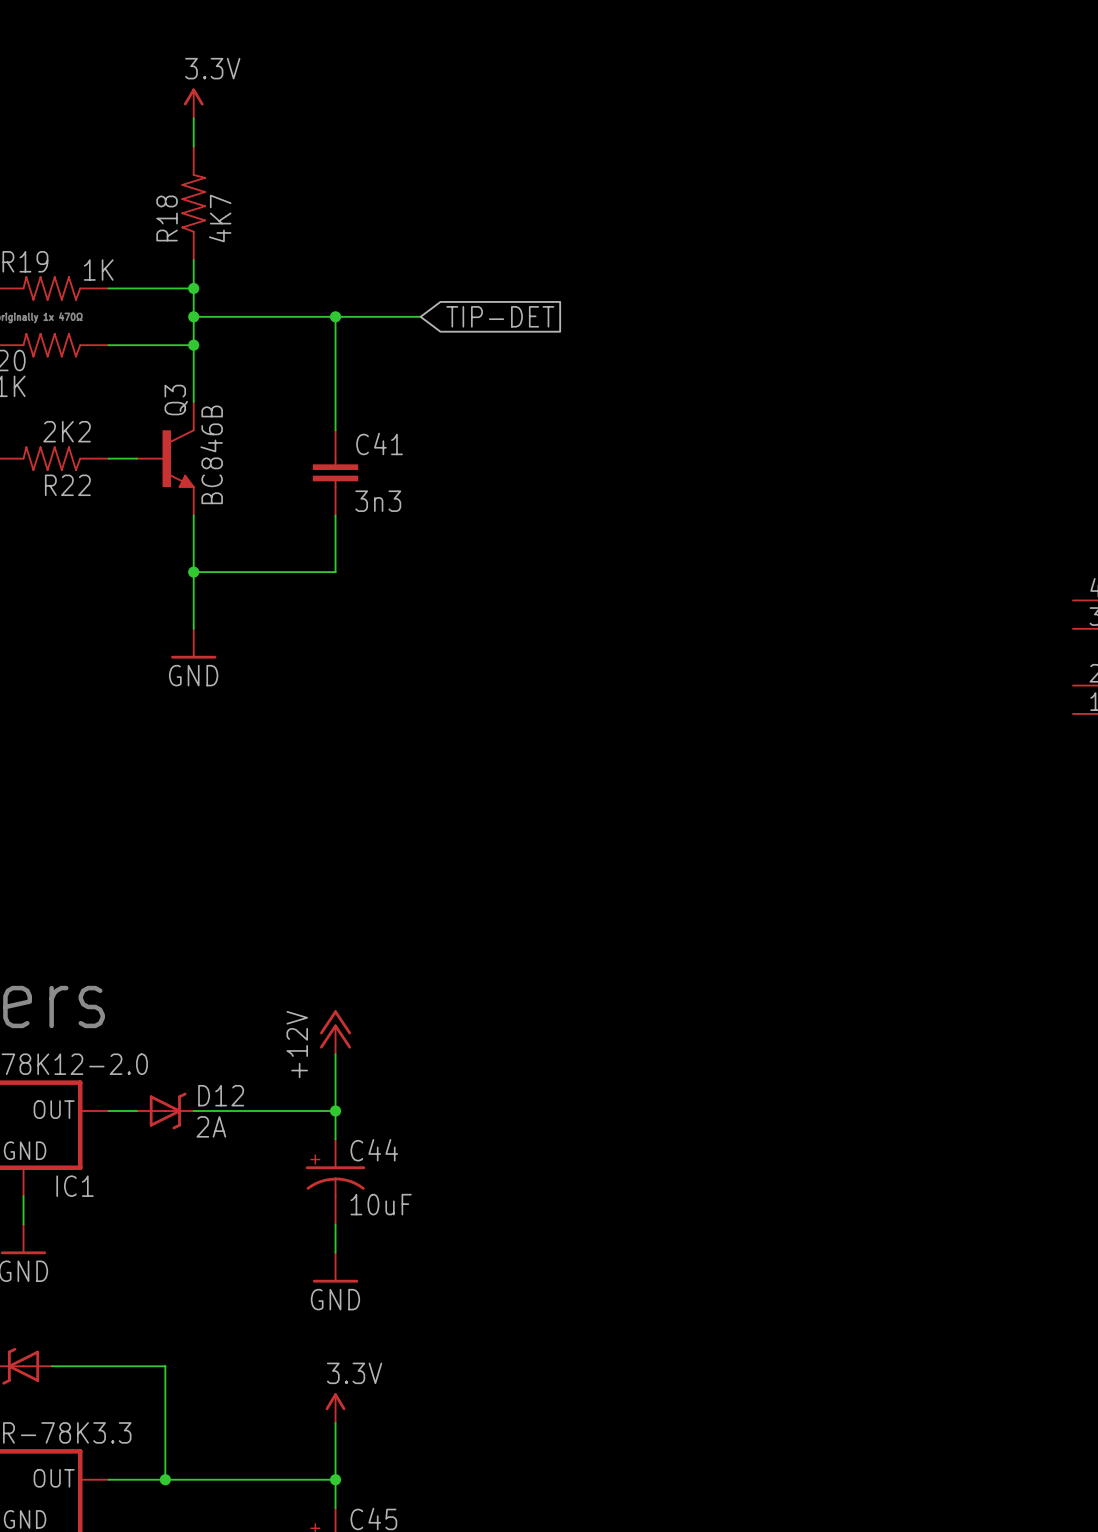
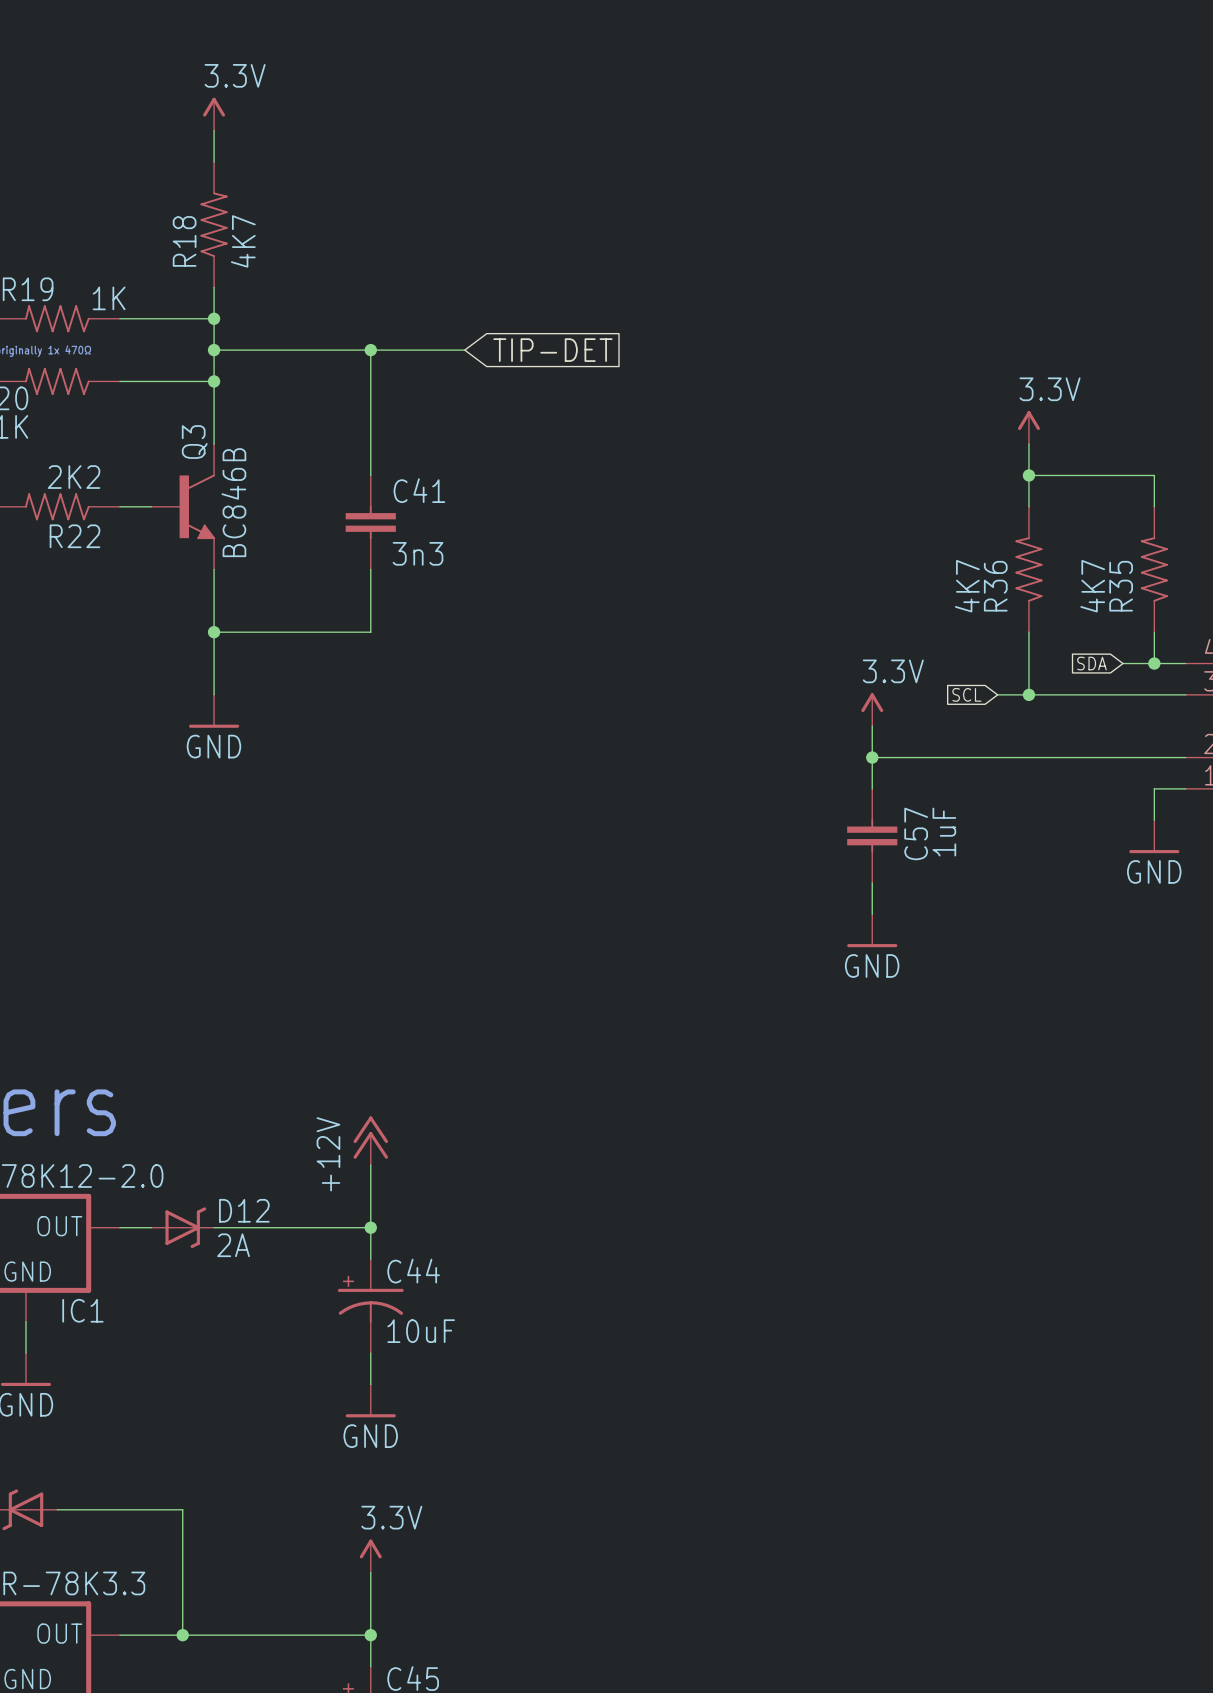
power symbol: none -> 3.3V (1028, 427)
wire: none -> (1028, 444) (1028, 506)
wire: none -> (1028, 475) (1154, 475) (1154, 506)
junction: none -> (1028, 475)
R36: none -> 4K7 (1028, 569)
R35: none -> 4K7 (1154, 569)
wire: none -> (1028, 632) (1028, 694)
wire: none -> (1154, 632) (1154, 663)
global label: none -> SDA (1091, 663)
wire: none -> (1123, 663) (1185, 663)
junction: none -> (1154, 663)
global label: none -> SCL (966, 694)
wire: none -> (997, 694) (1185, 694)
junction: none -> (1028, 694)
power symbol: none -> 3.3V (872, 709)
wire: none -> (872, 726) (872, 788)
wire: none -> (872, 757) (1185, 757)
junction: none -> (872, 757)
wire: none -> (1185, 788) (1154, 788) (1154, 820)
C57: none -> 1uF (872, 835)
power symbol: none -> GND (1154, 836)
wire: none -> (872, 882) (872, 914)
power symbol: none -> GND (872, 930)

